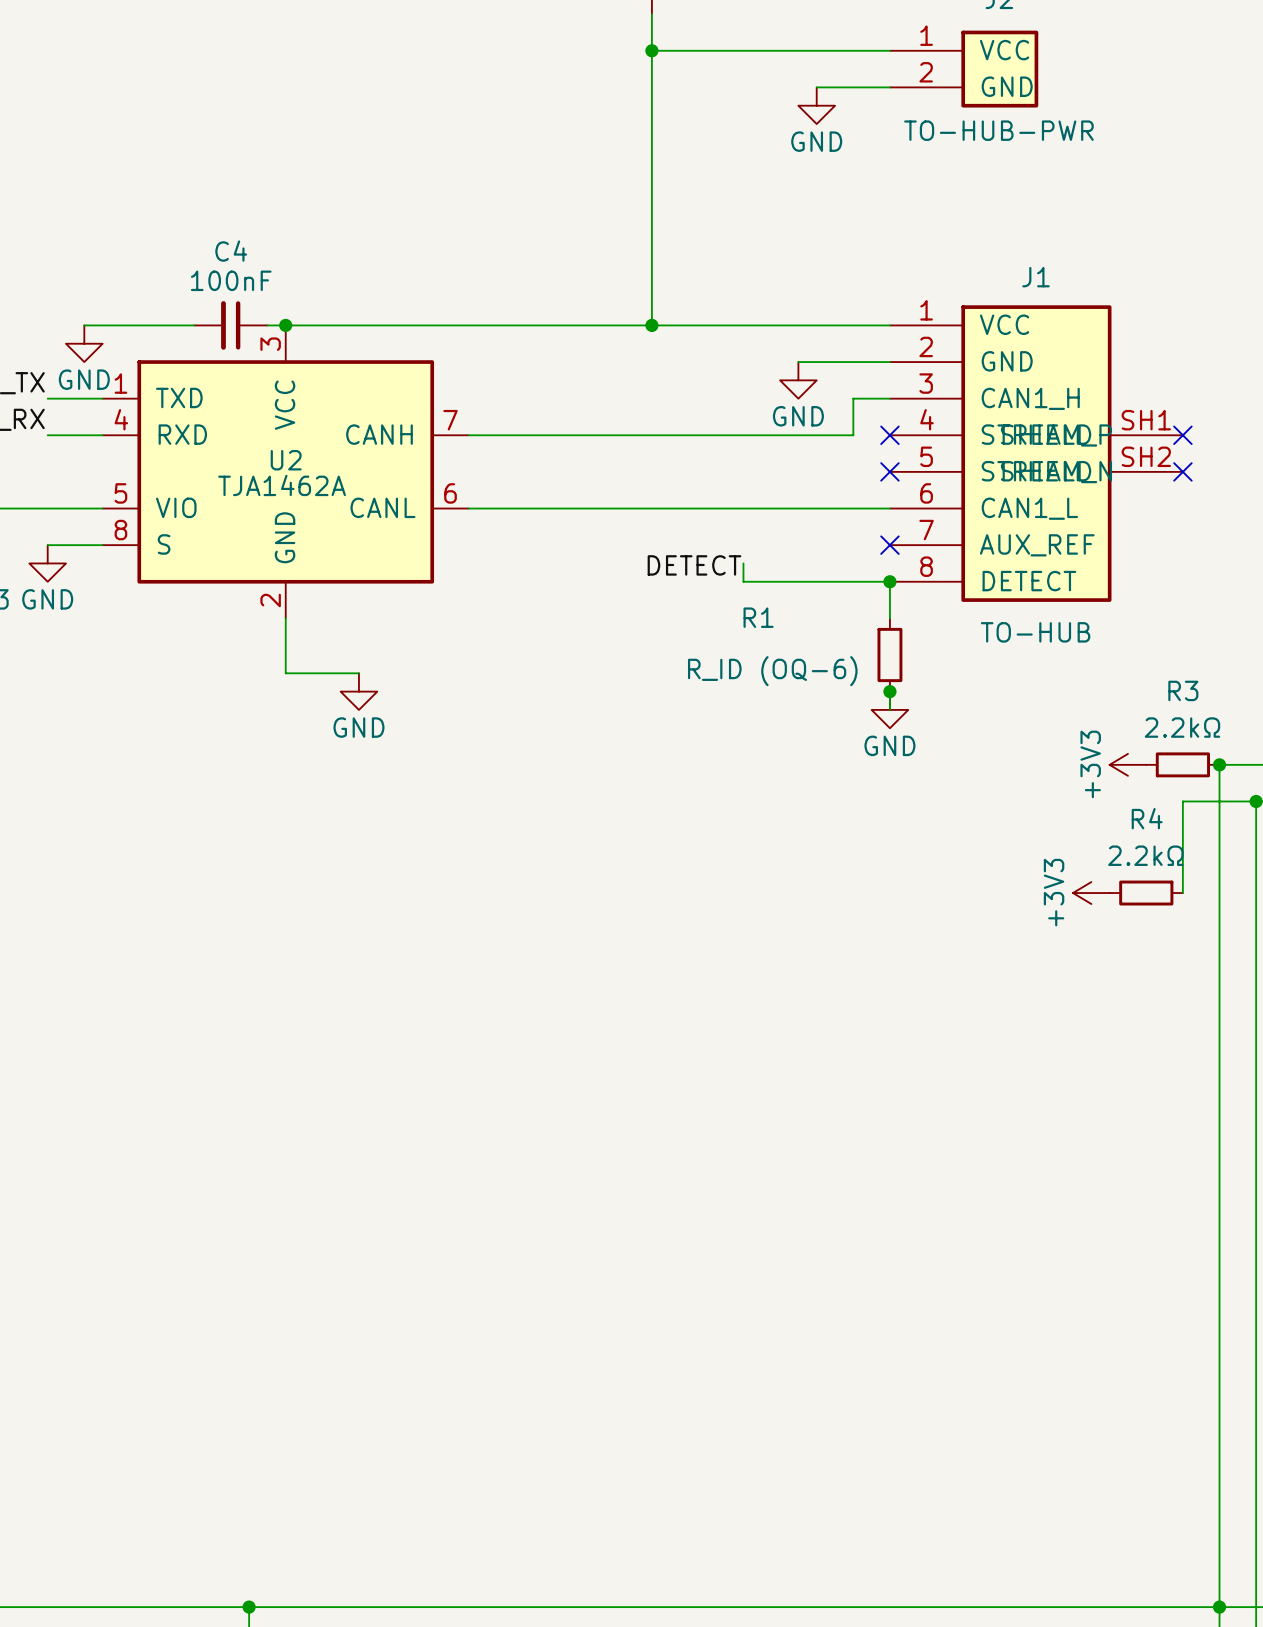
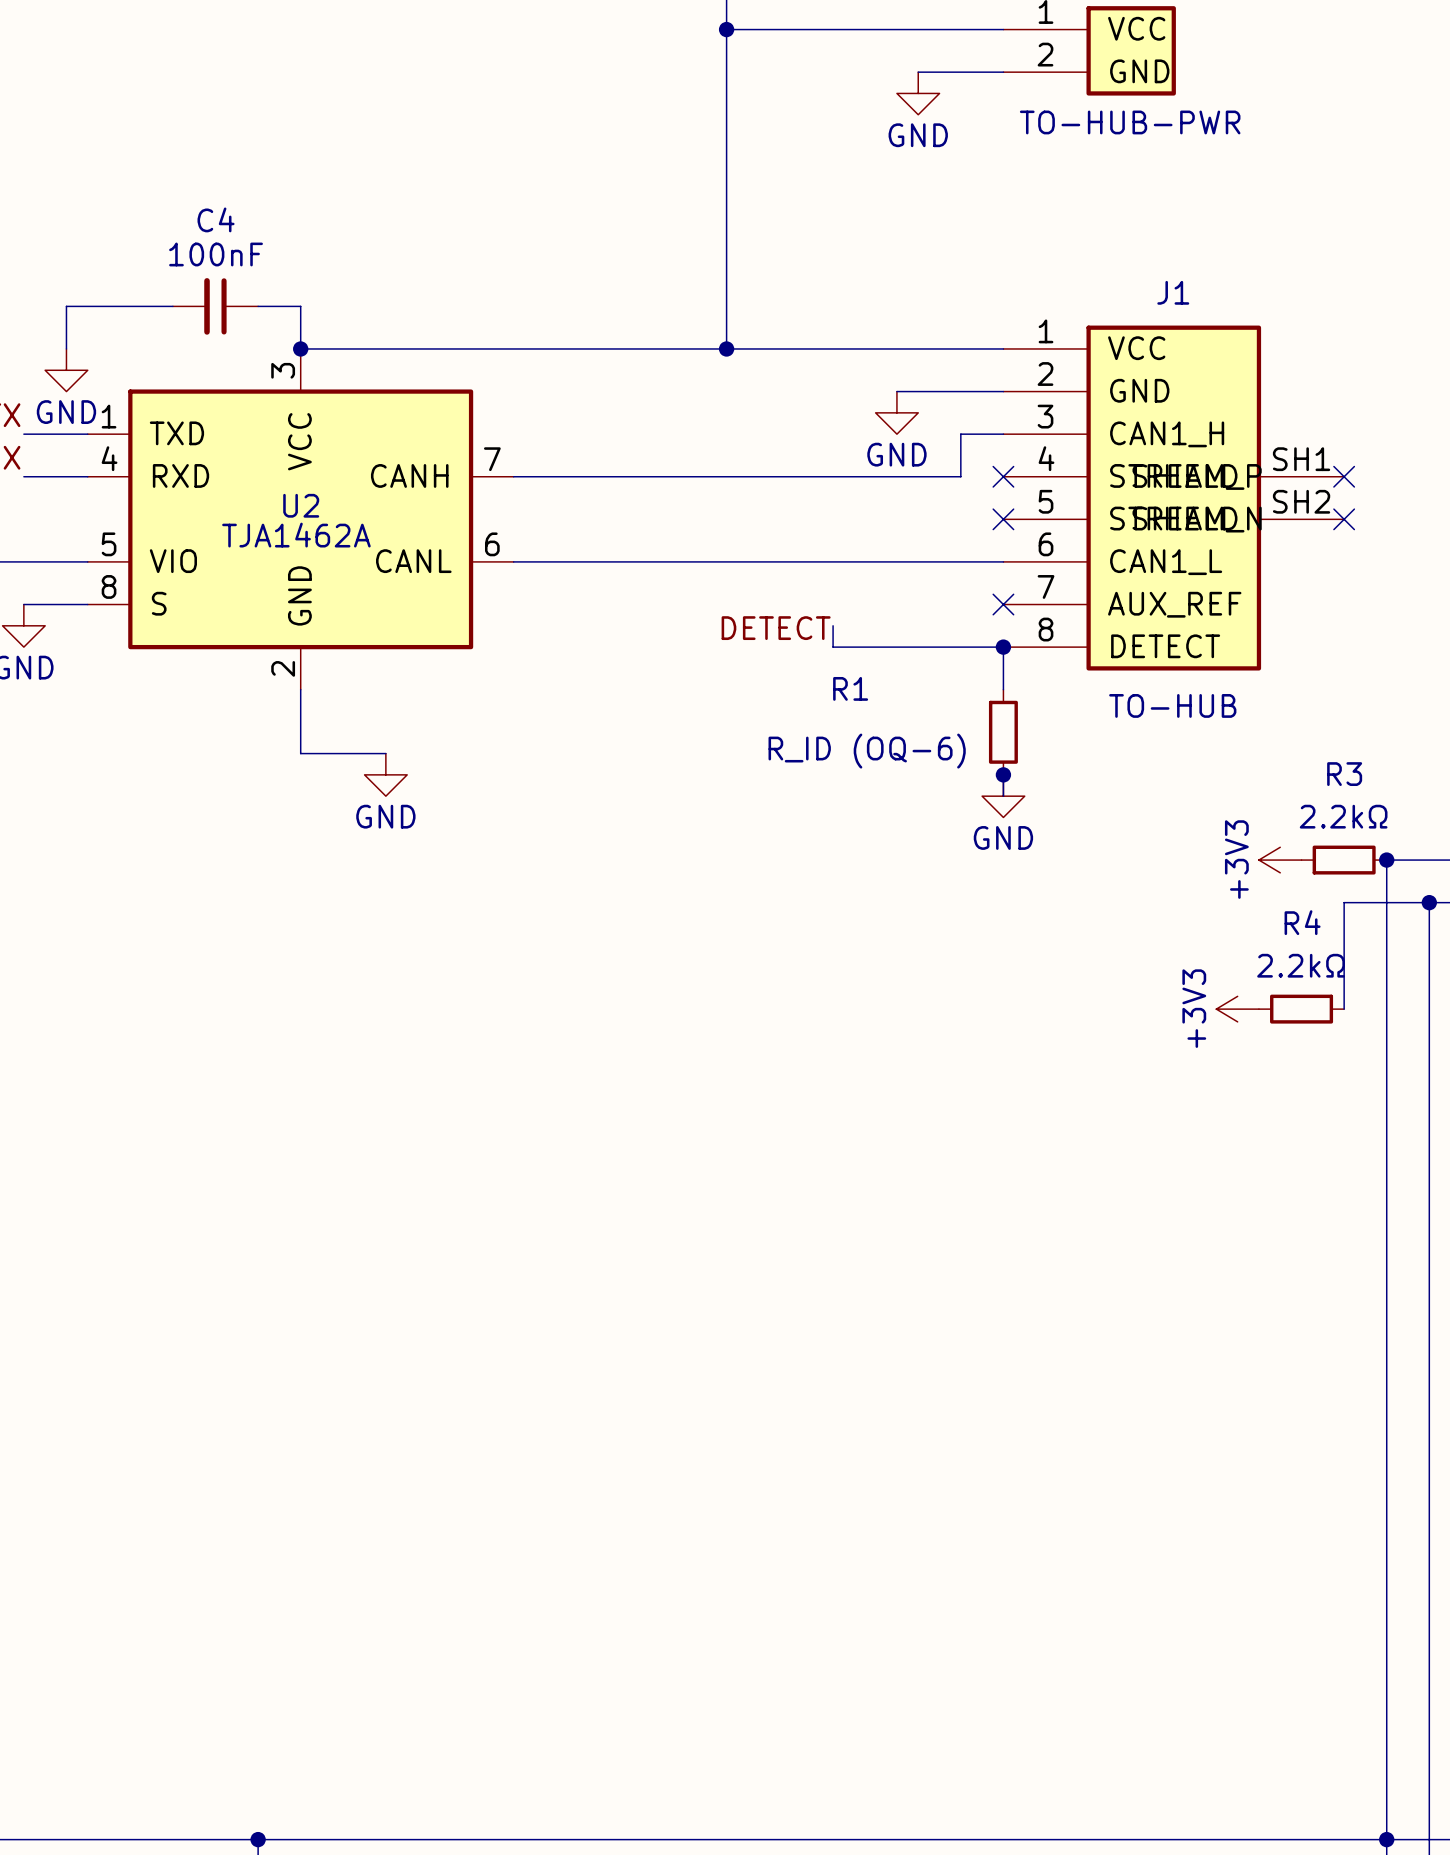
wire: (84, 325) (194, 325) -> (66, 348) (66, 306) (172, 306)
C4 position: (230, 325) -> (215, 306)
wire: (267, 325) (285, 325) -> (258, 306) (300, 306) (300, 348)

